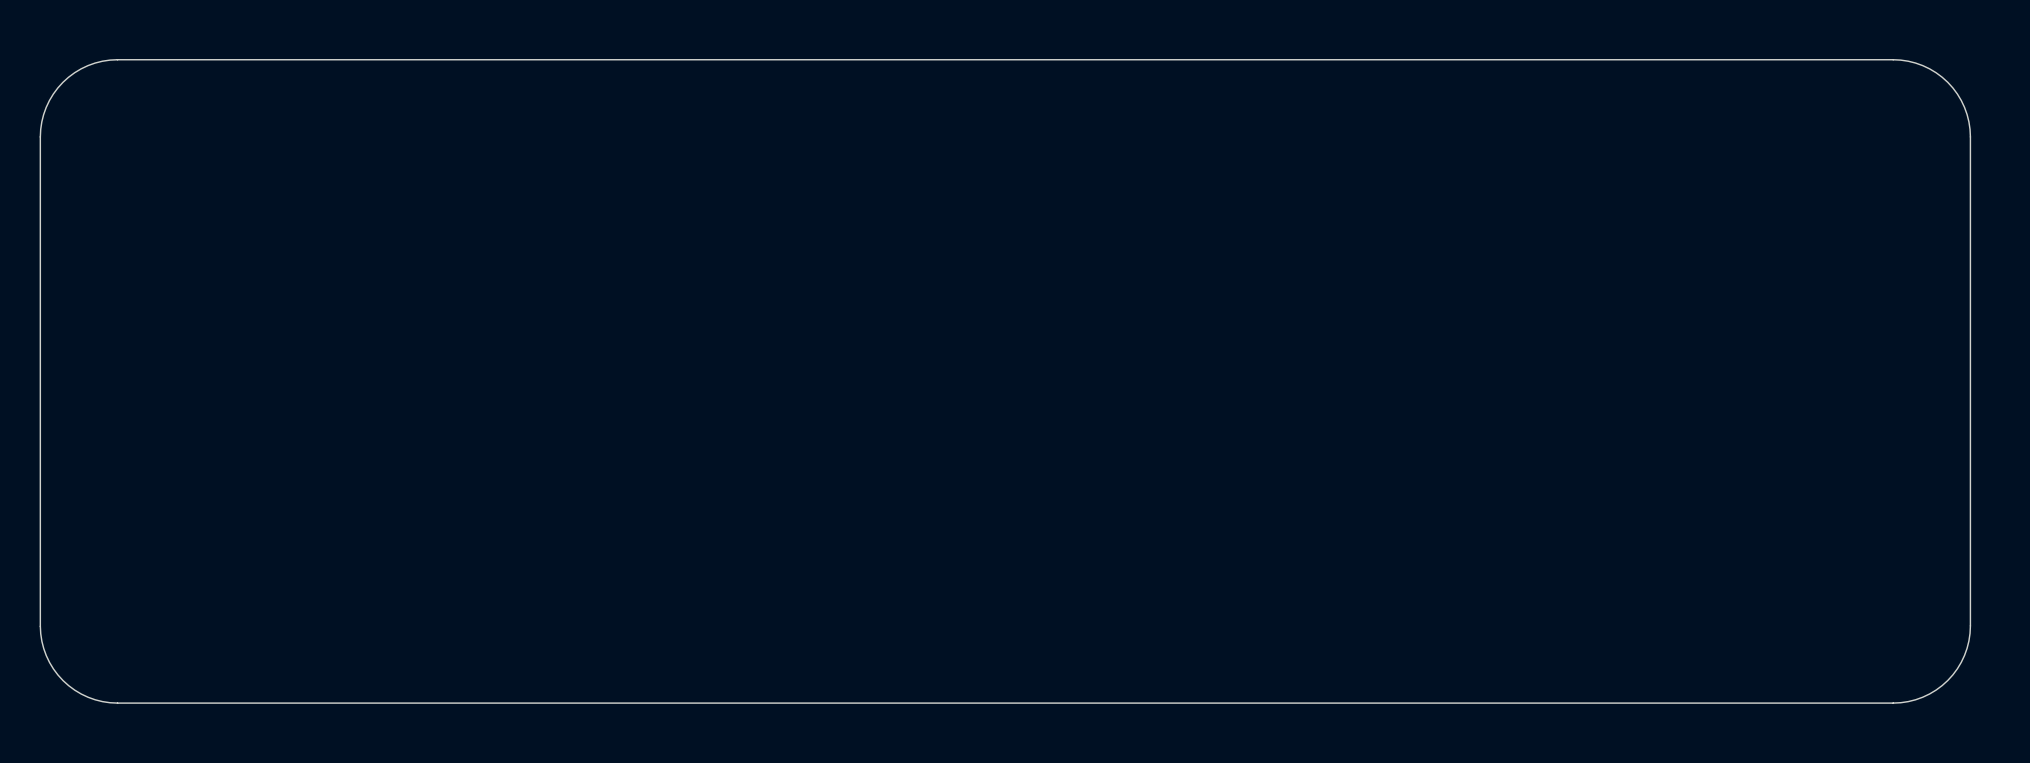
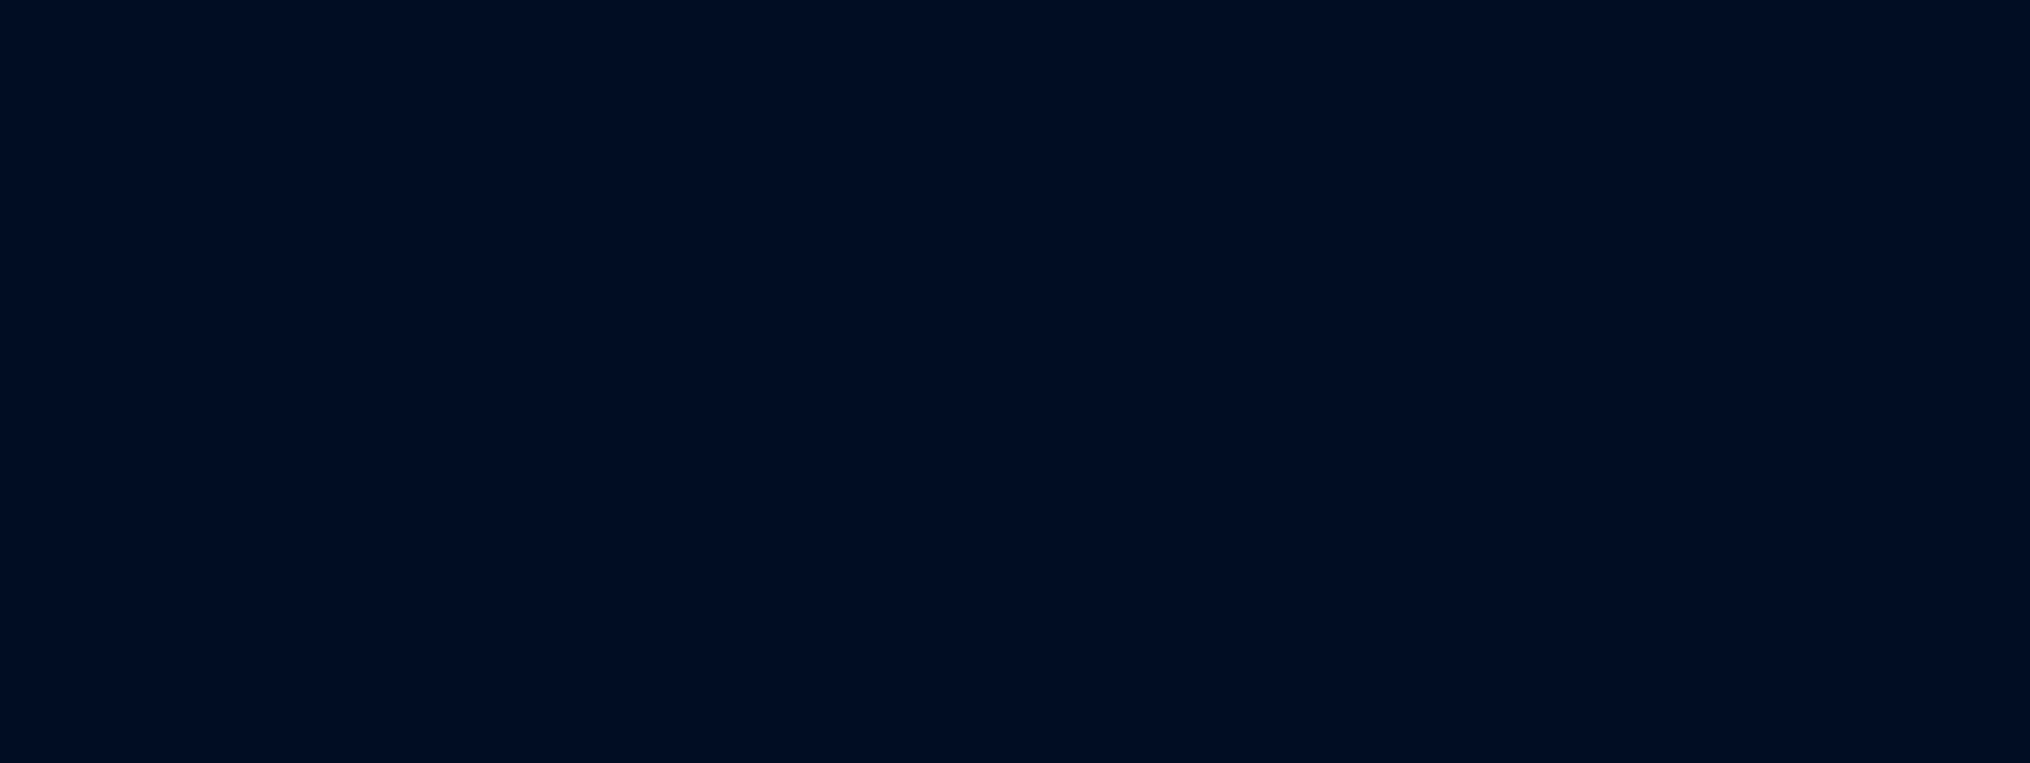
board edge: (117, 59) (1893, 59) (1915, 63) (1936, 72) (1952, 87) (1964, 107) (1970, 129) (1970, 625) (1967, 648) (1957, 668) (1942, 685) (1922, 697) (1893, 703) (117, 703) (95, 699) (74, 690) (58, 675) (46, 655) (40, 633) (40, 136) (46, 107) (62, 82) (87, 65) (117, 59) -> none

